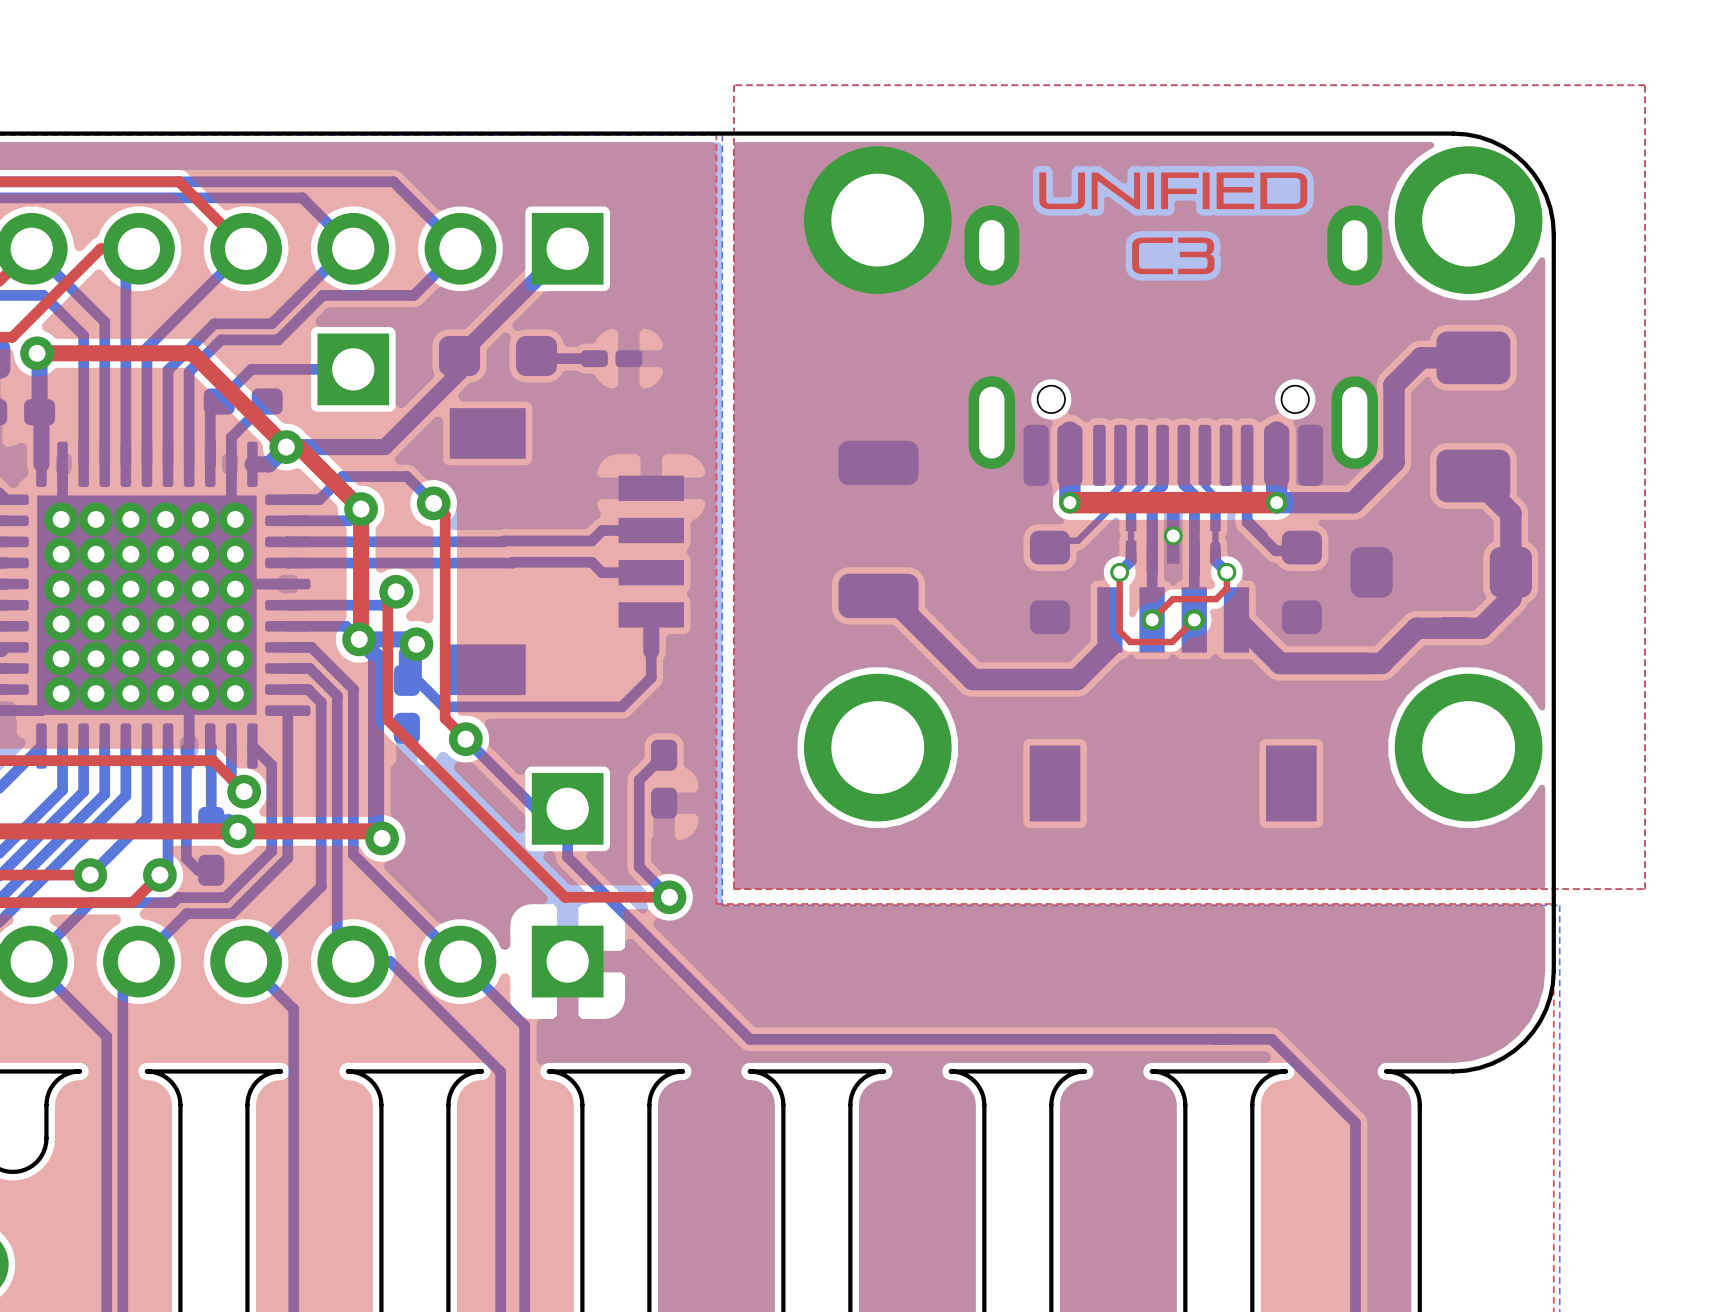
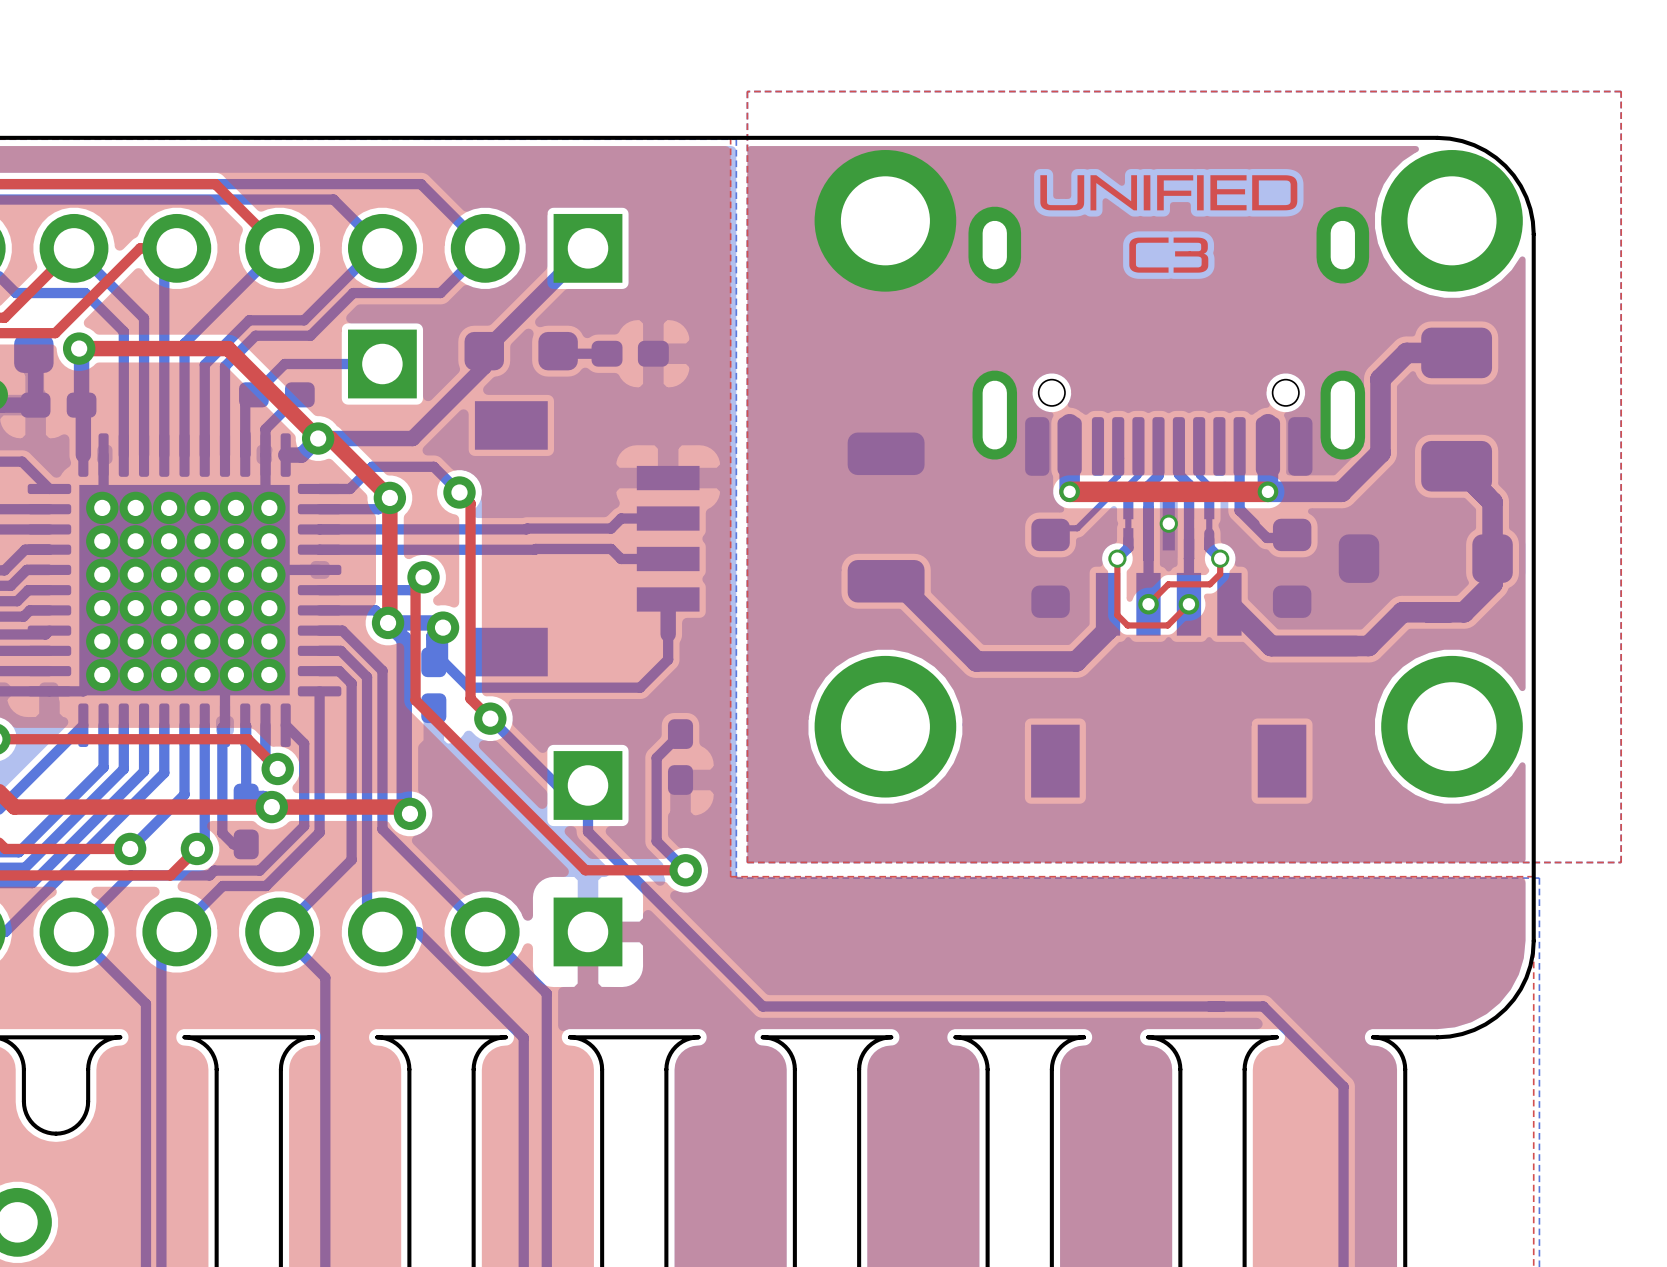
part footprint: [581, 350, 643, 368] -> [591, 340, 669, 367]

